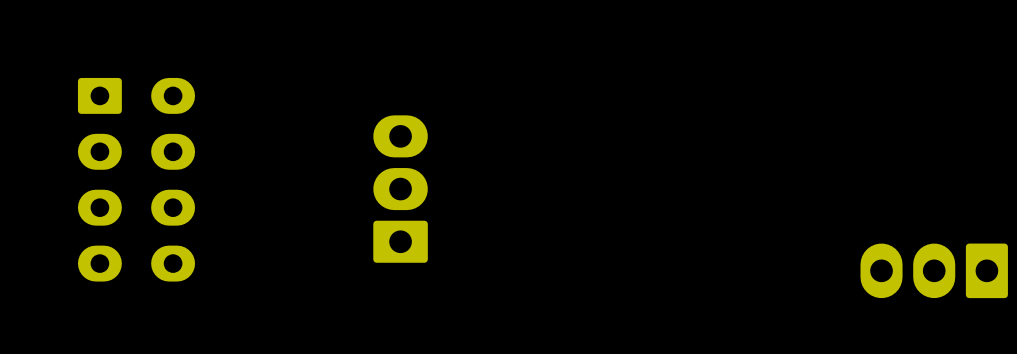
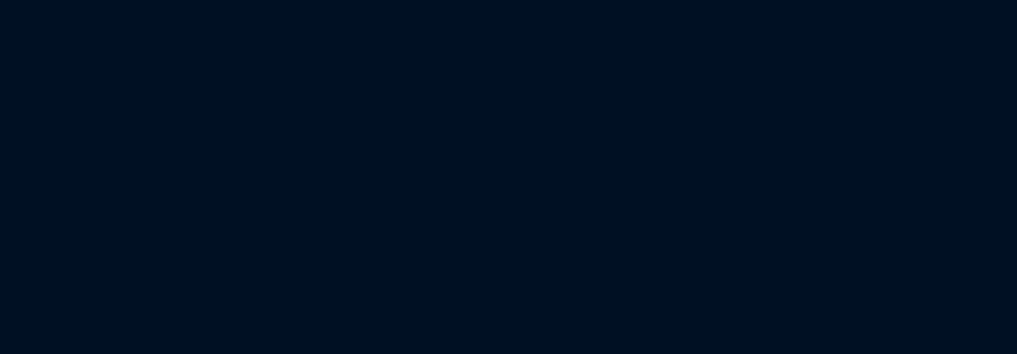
part: (136, 179) -> none
part: (400, 189) -> none
part: (934, 270) -> none

